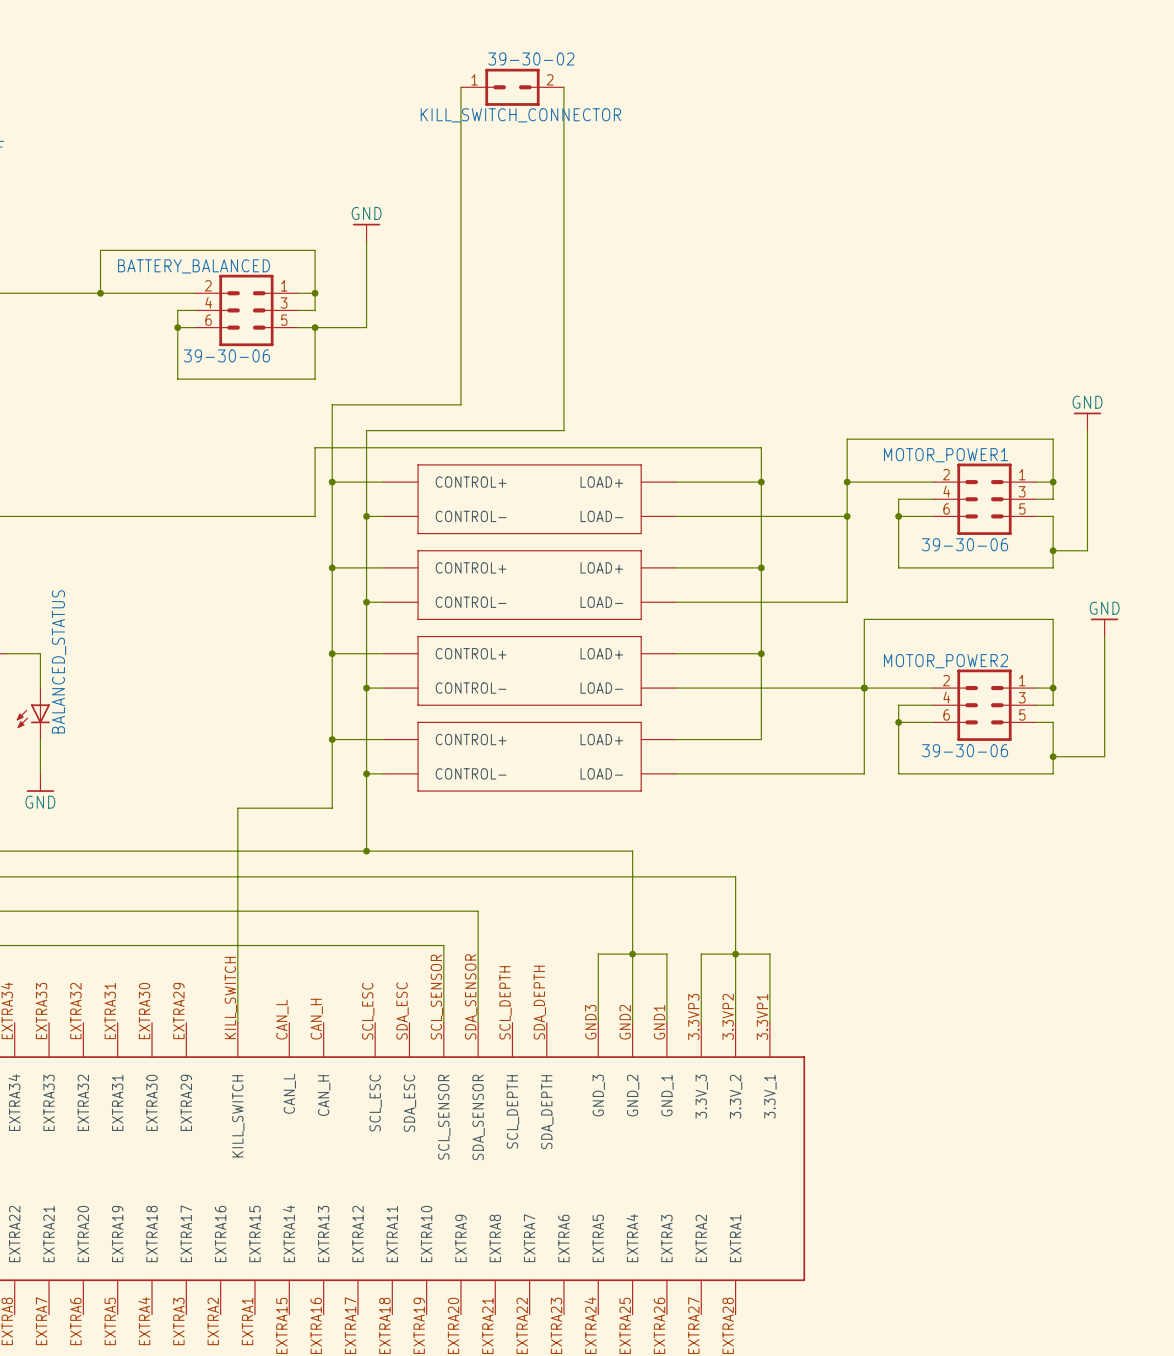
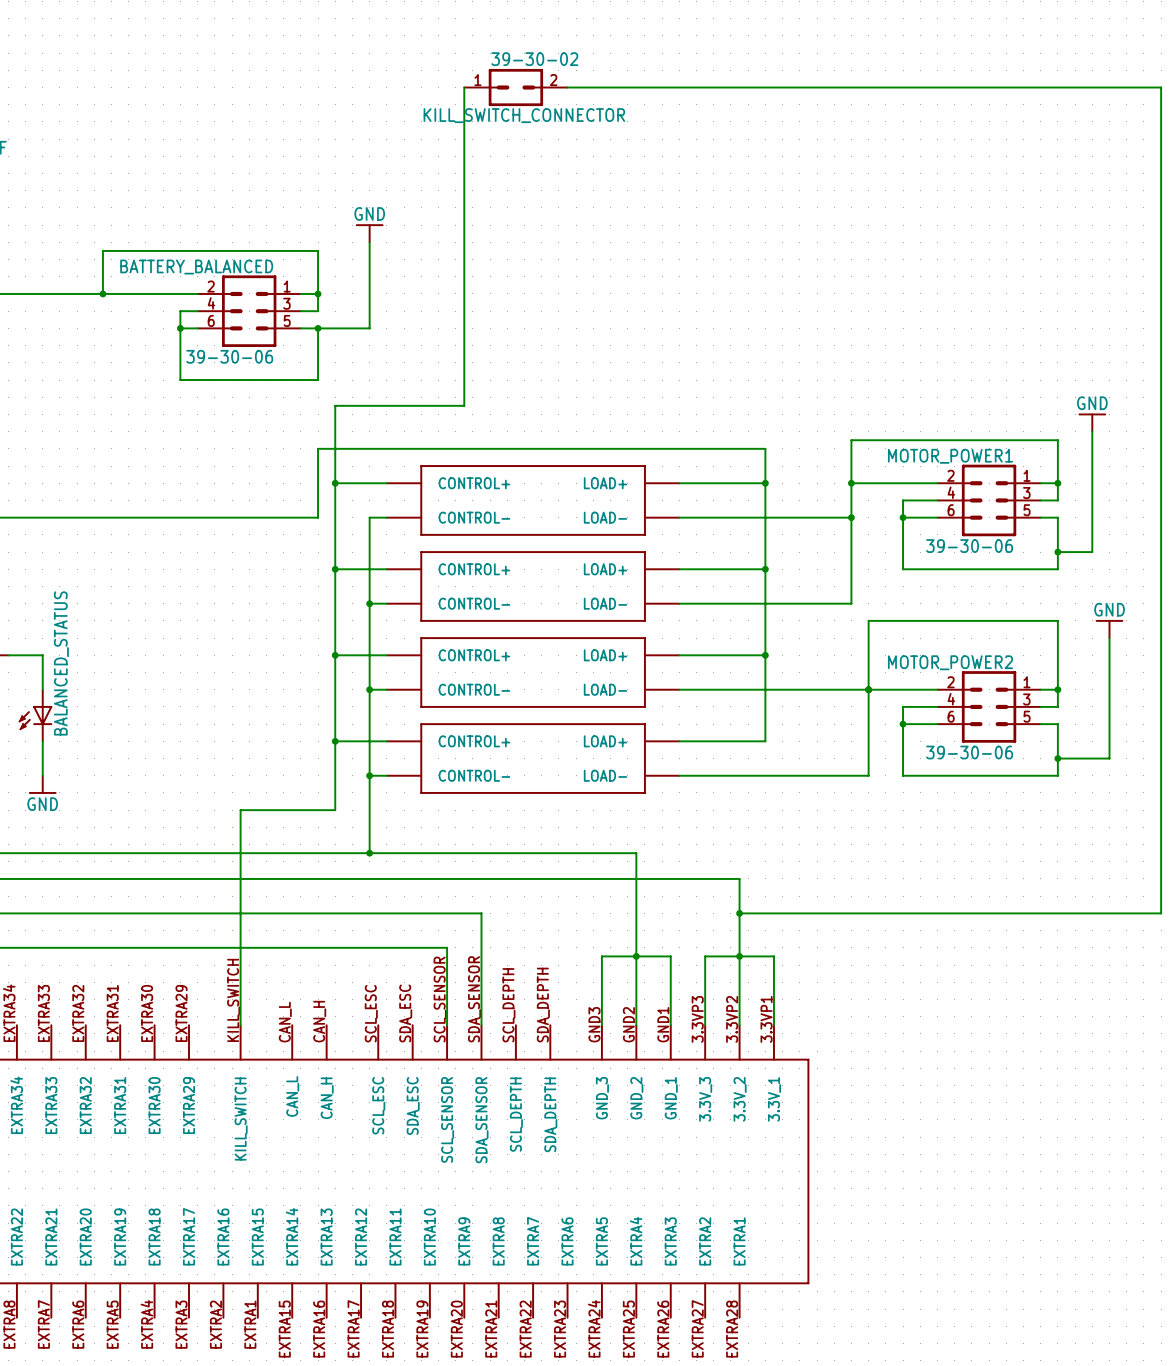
wire: (563, 87) (563, 430) (366, 430) (366, 516) -> (567, 87) (1161, 87) (1161, 913) (739, 913)
junction: (366, 516) -> none
junction: none -> (739, 913)

